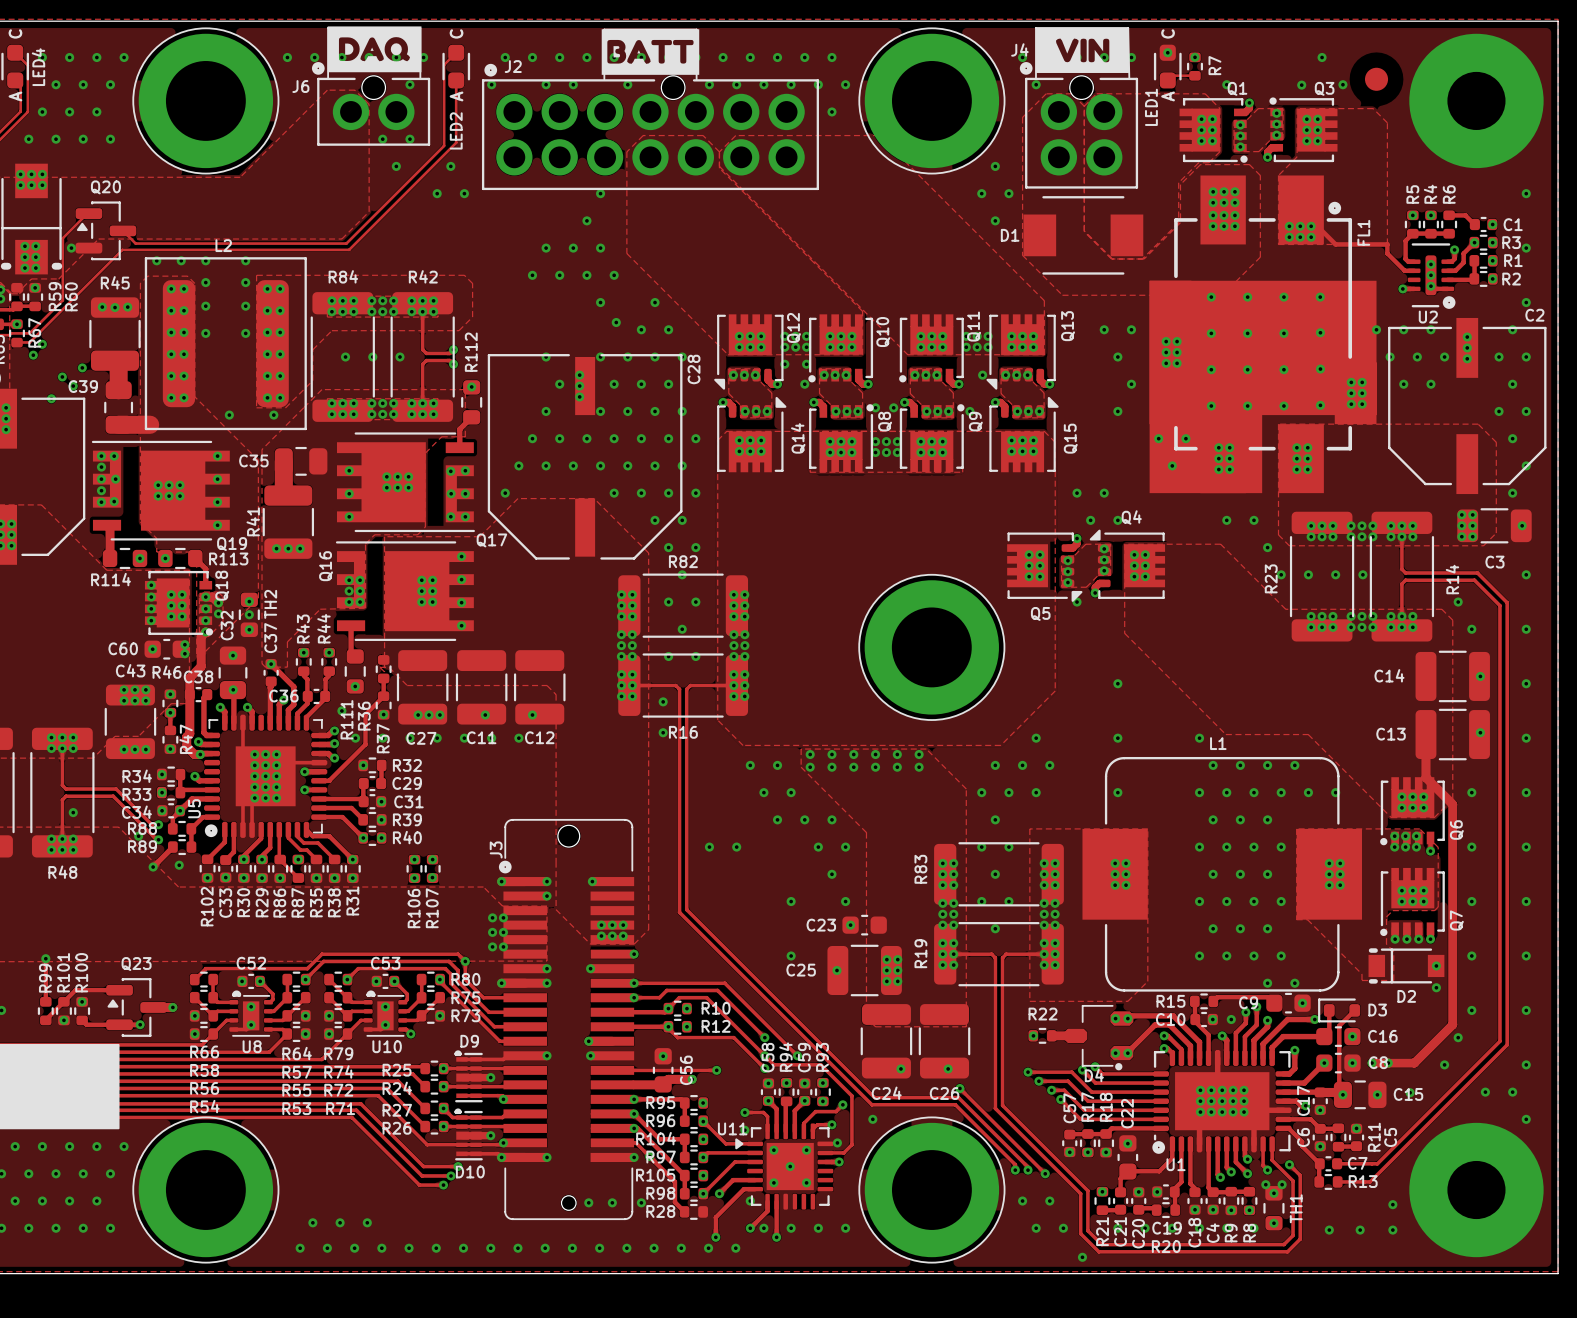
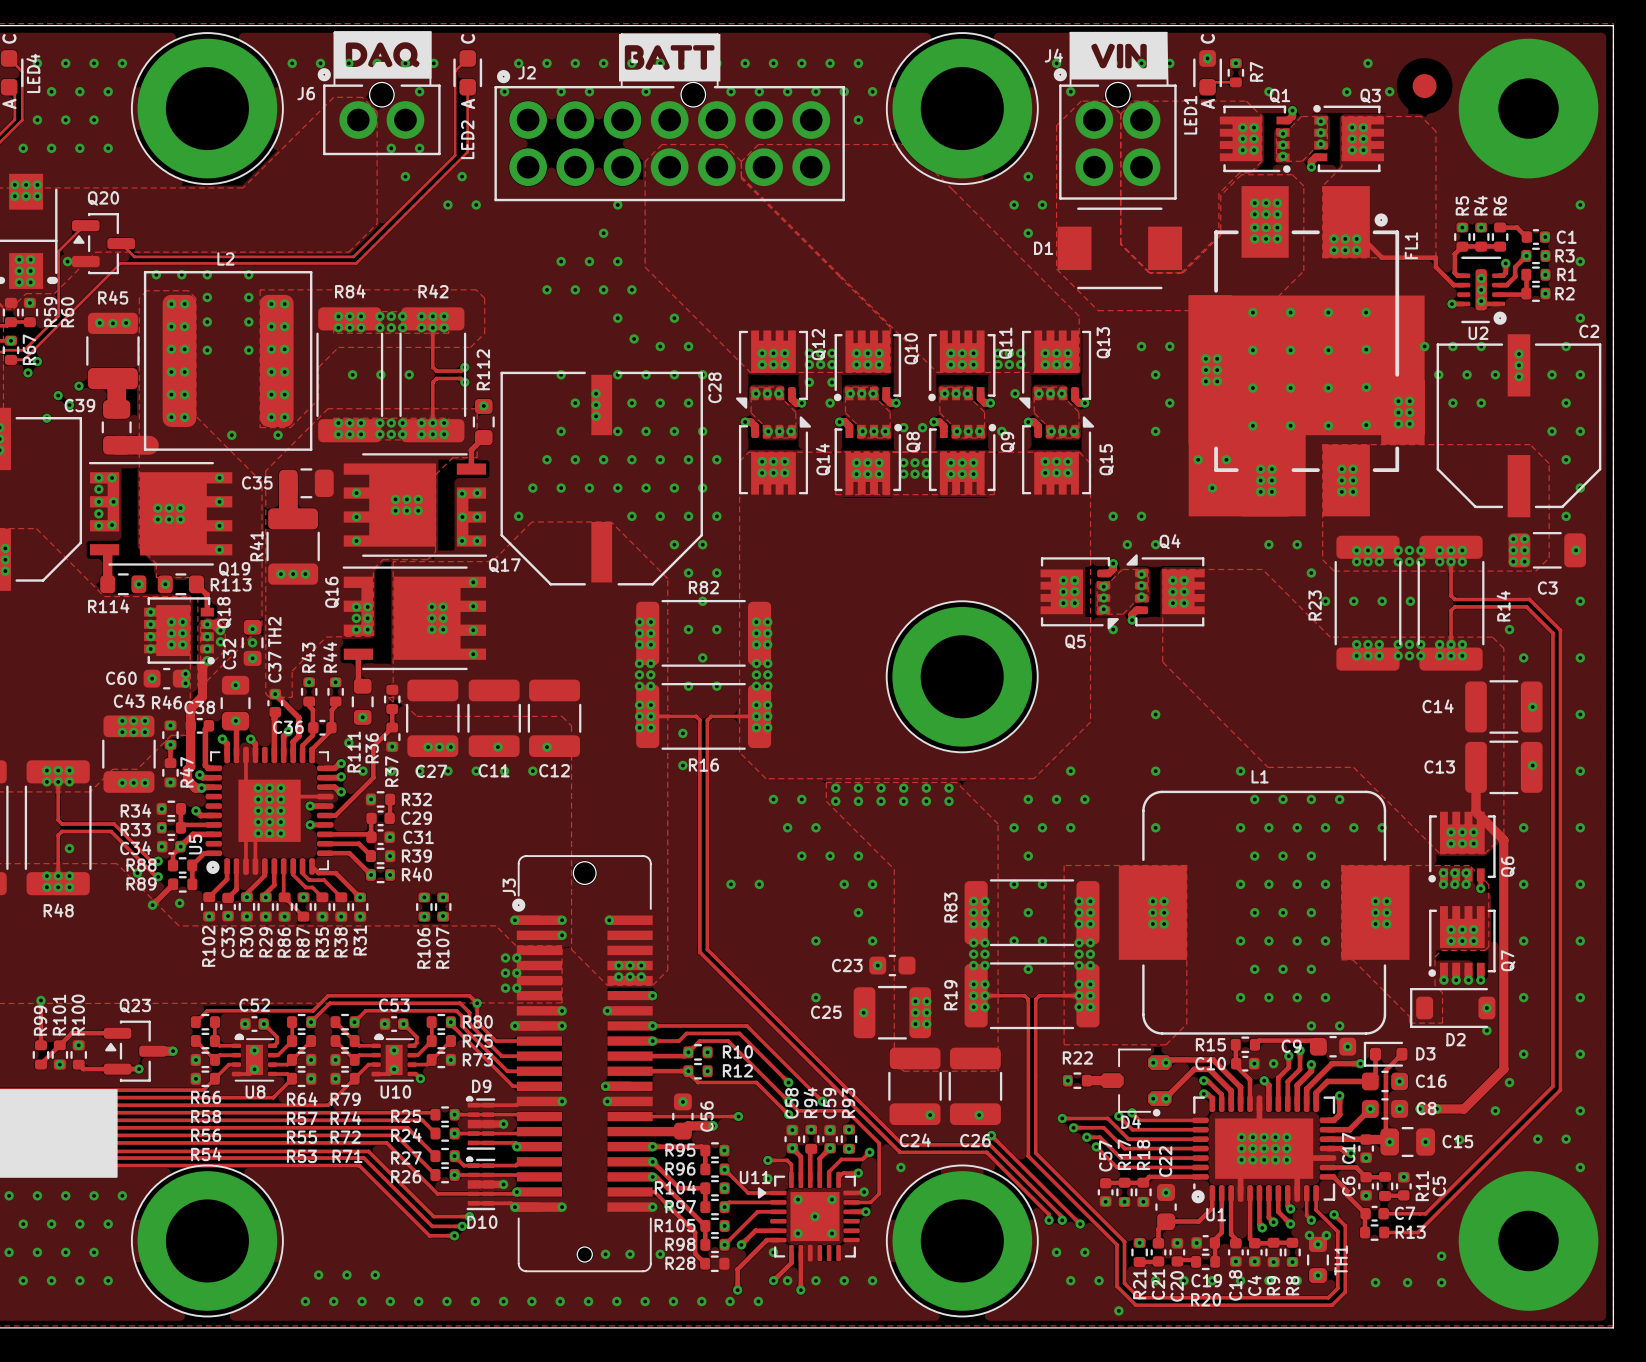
D2 footprint: [1368, 948, 1445, 984] -> [1410, 987, 1496, 1029]

